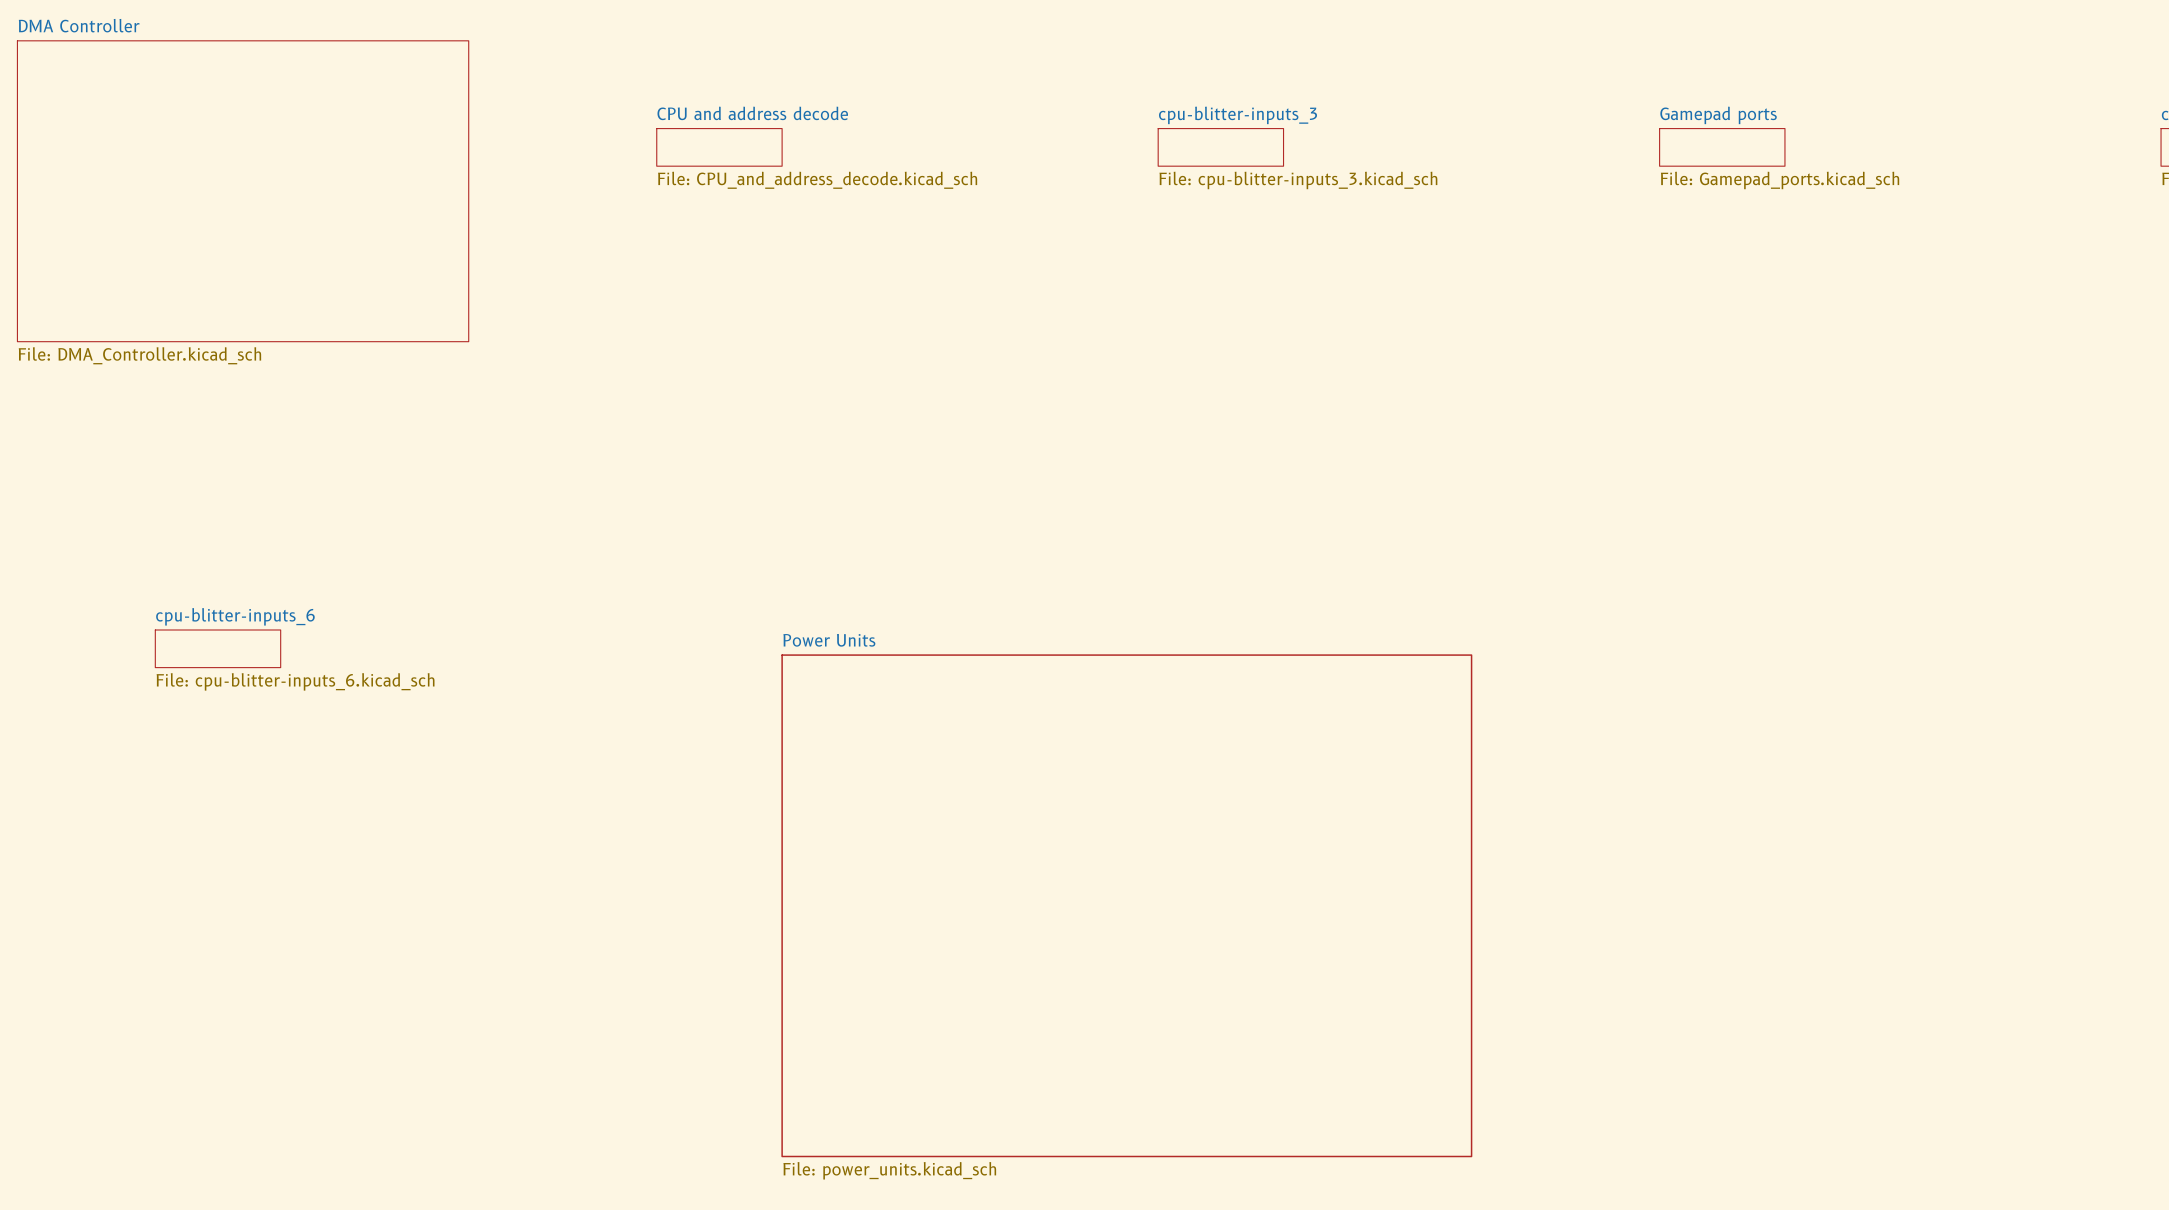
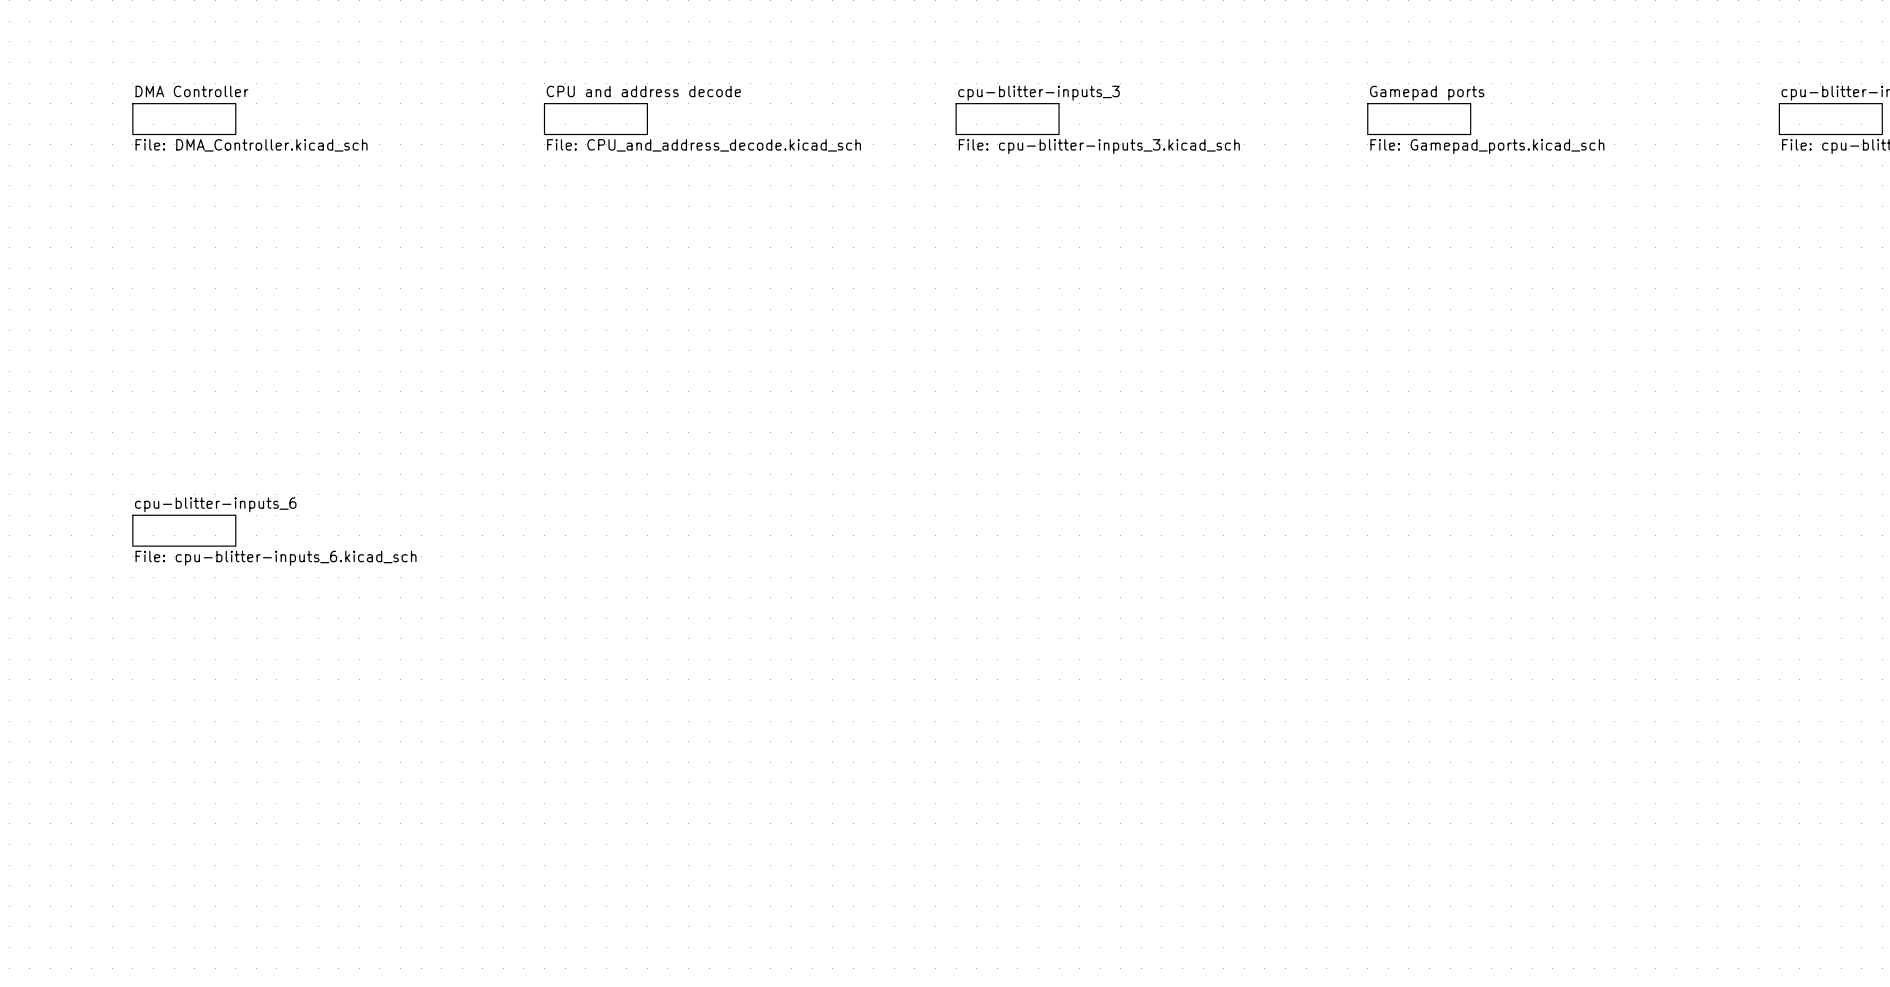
sheet DMA Controller: none -> File: DMA_Controller.kicad_sch (184, 119)
sheet DMA Controller: File: DMA_Controller.kicad_sch (243, 191) -> none
sheet Power Units: File: power_units.kicad_sch (1126, 905) -> none

